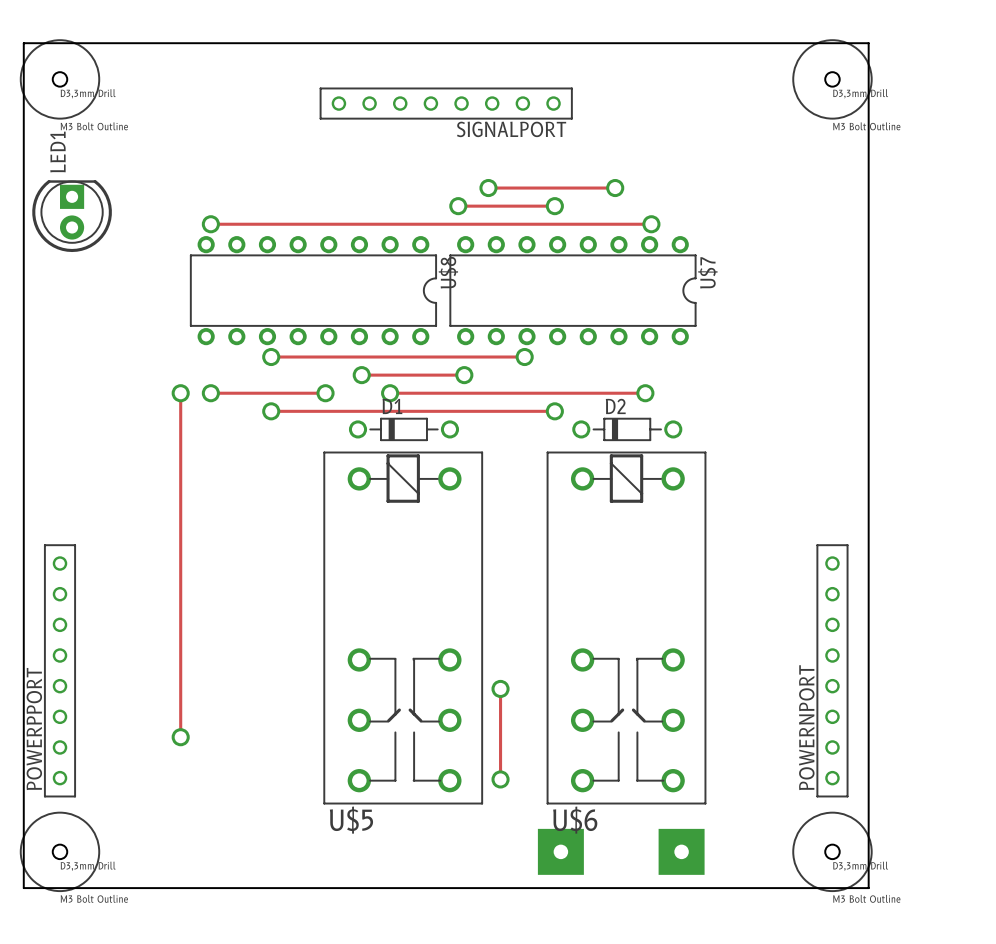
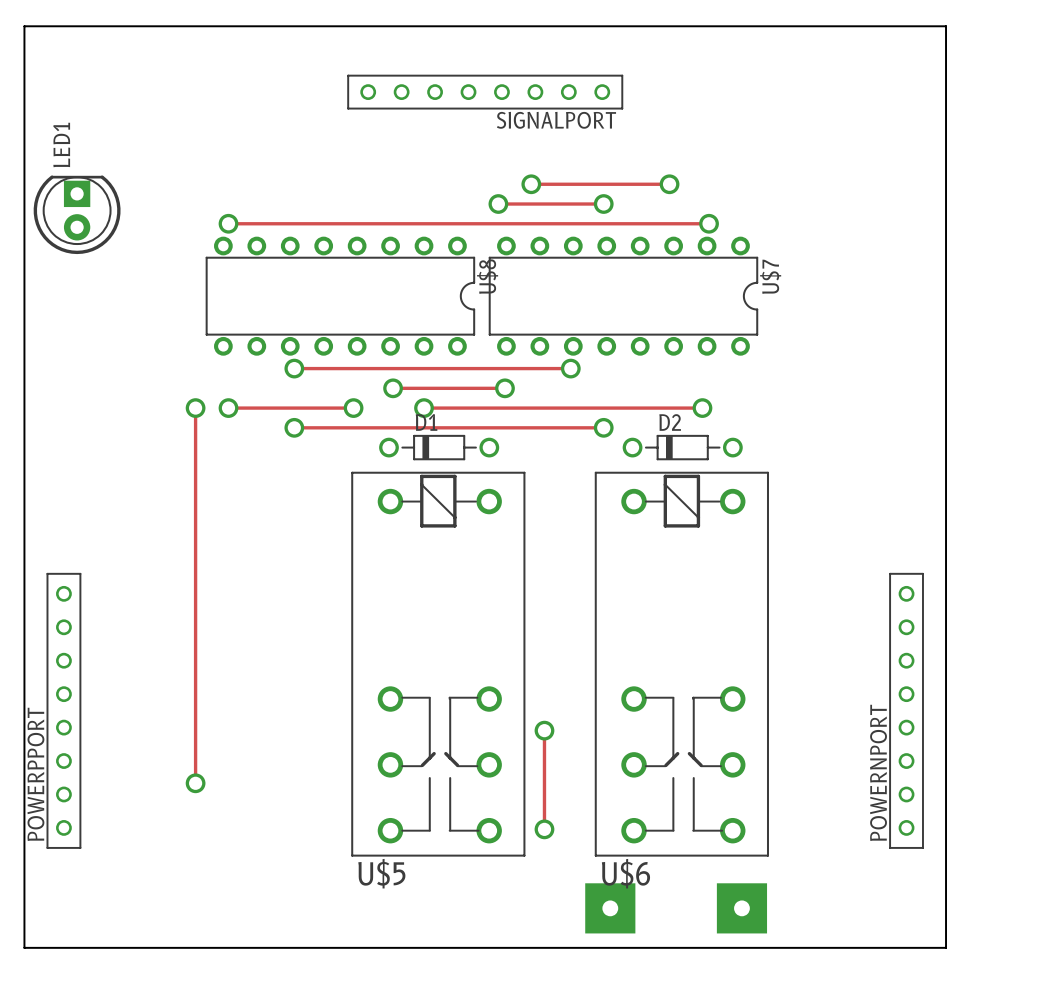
part: (59, 79) -> none
part: (832, 79) -> none
part: (59, 851) -> none
part: (832, 851) -> none

